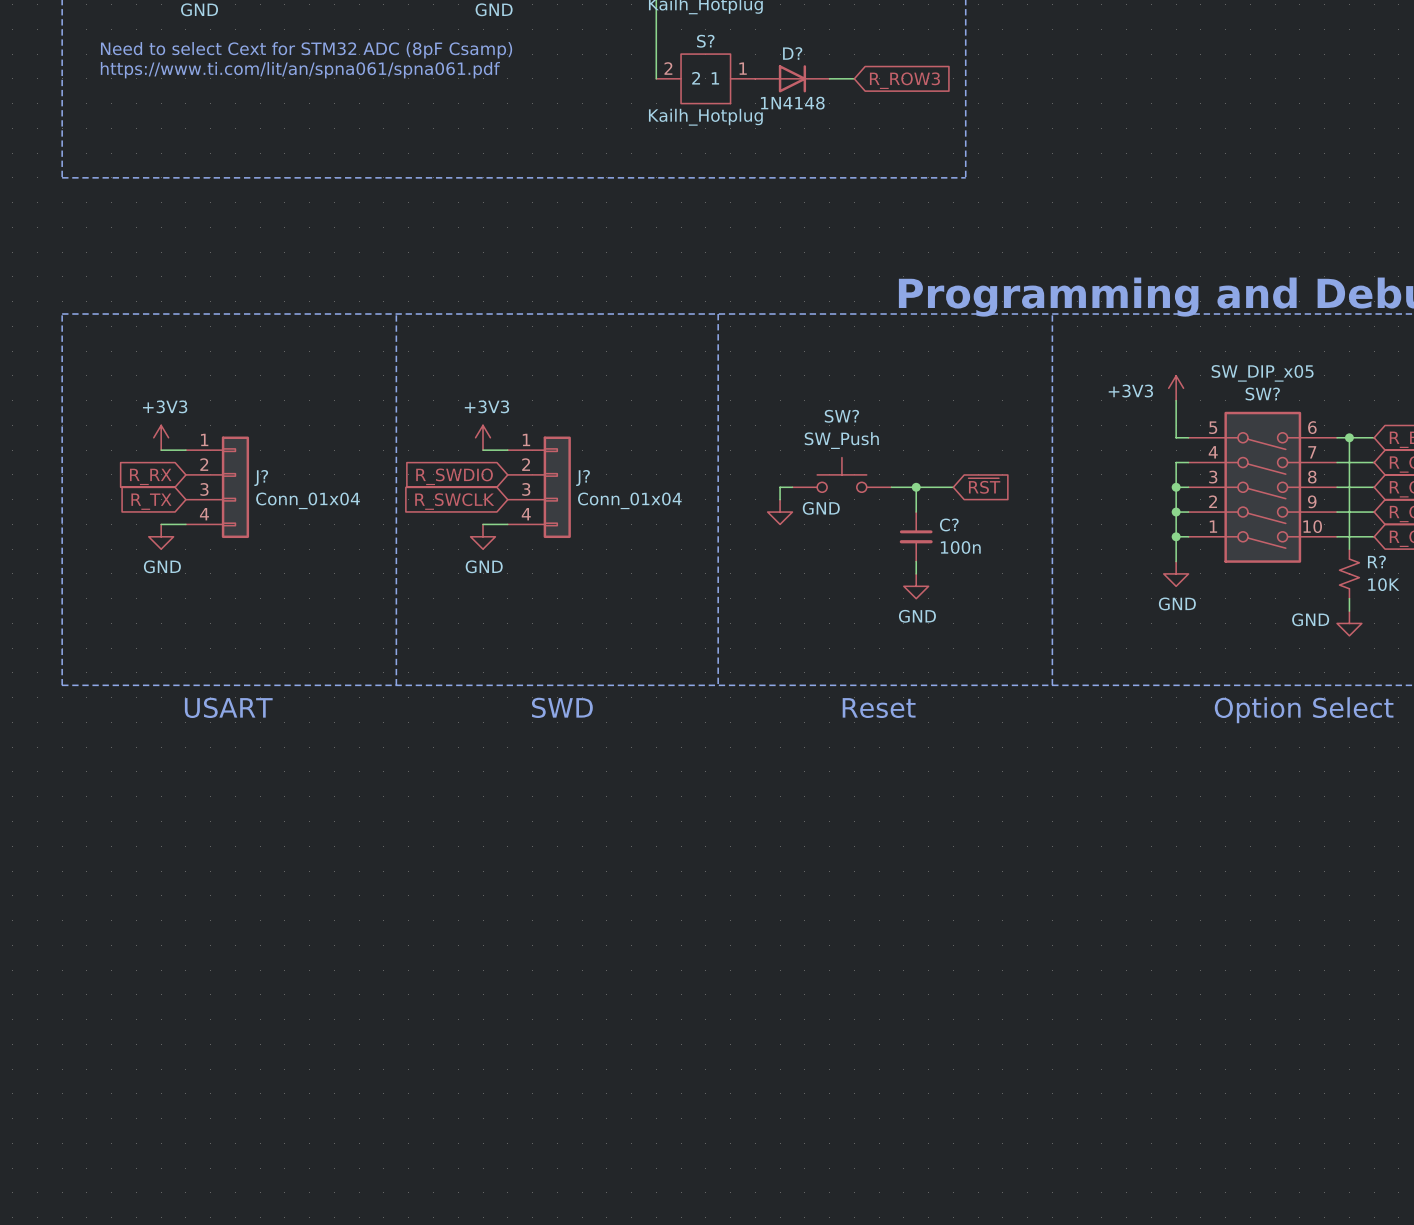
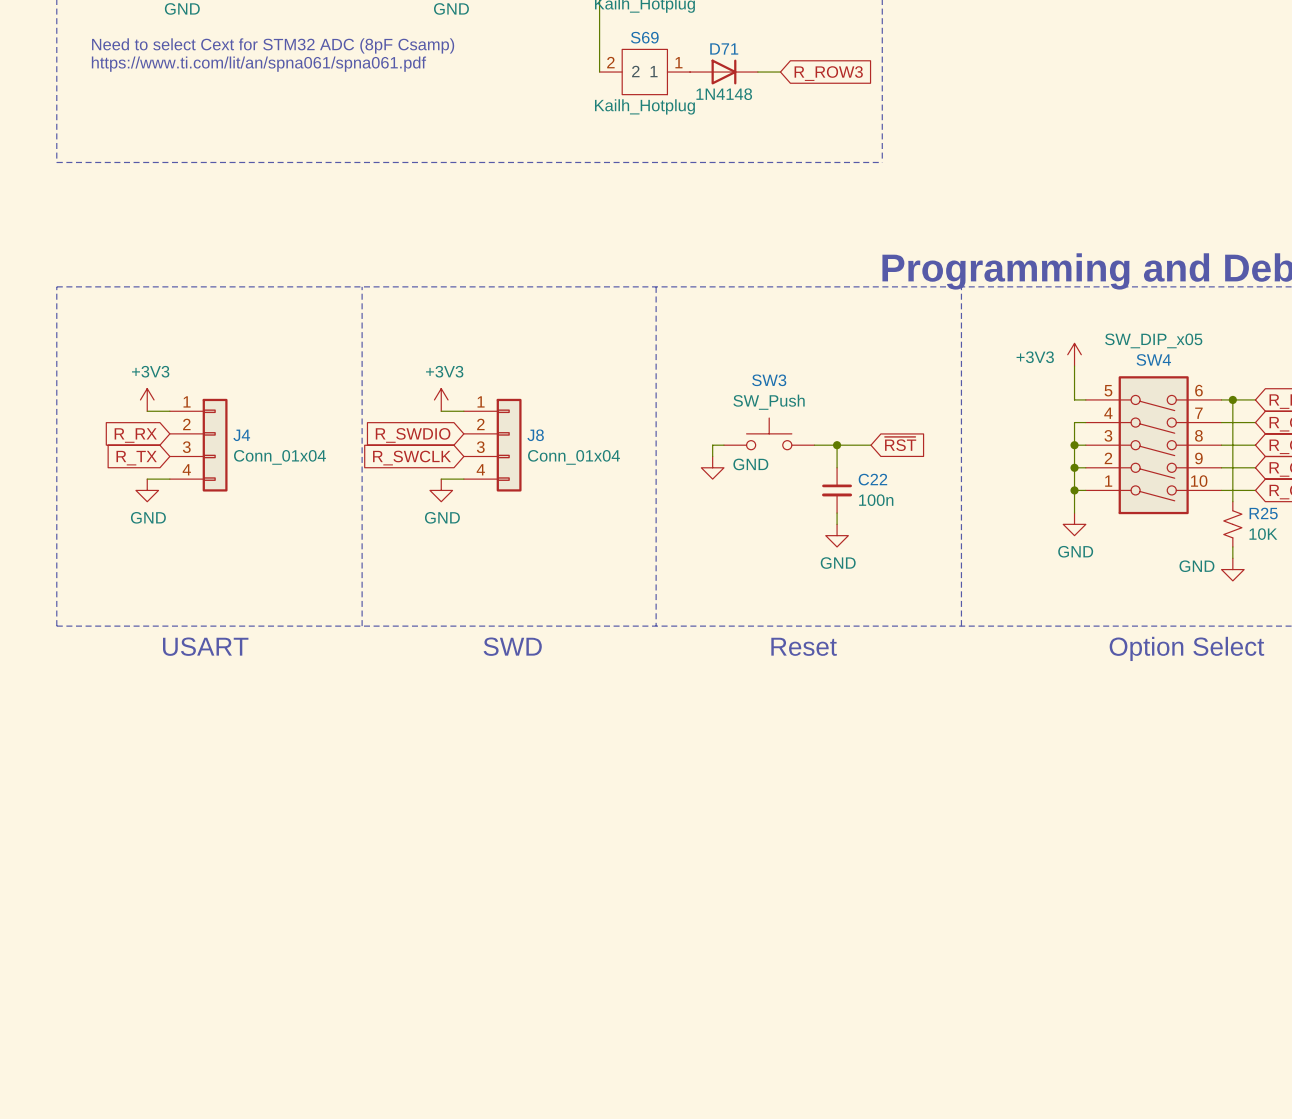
S? name: S? (705, 41) -> S69 (644, 37)
D? name: D? (792, 53) -> D71 (724, 48)
SW? name: SW? (1262, 394) -> SW4 (1153, 359)
SW? name: SW? (841, 416) -> SW3 (769, 380)
J? name: J? (261, 478) -> J4 (241, 435)
J? name: J? (583, 478) -> J8 (535, 435)
C? name: C? (949, 524) -> C22 (872, 479)
R? name: R? (1376, 561) -> R25 (1263, 513)

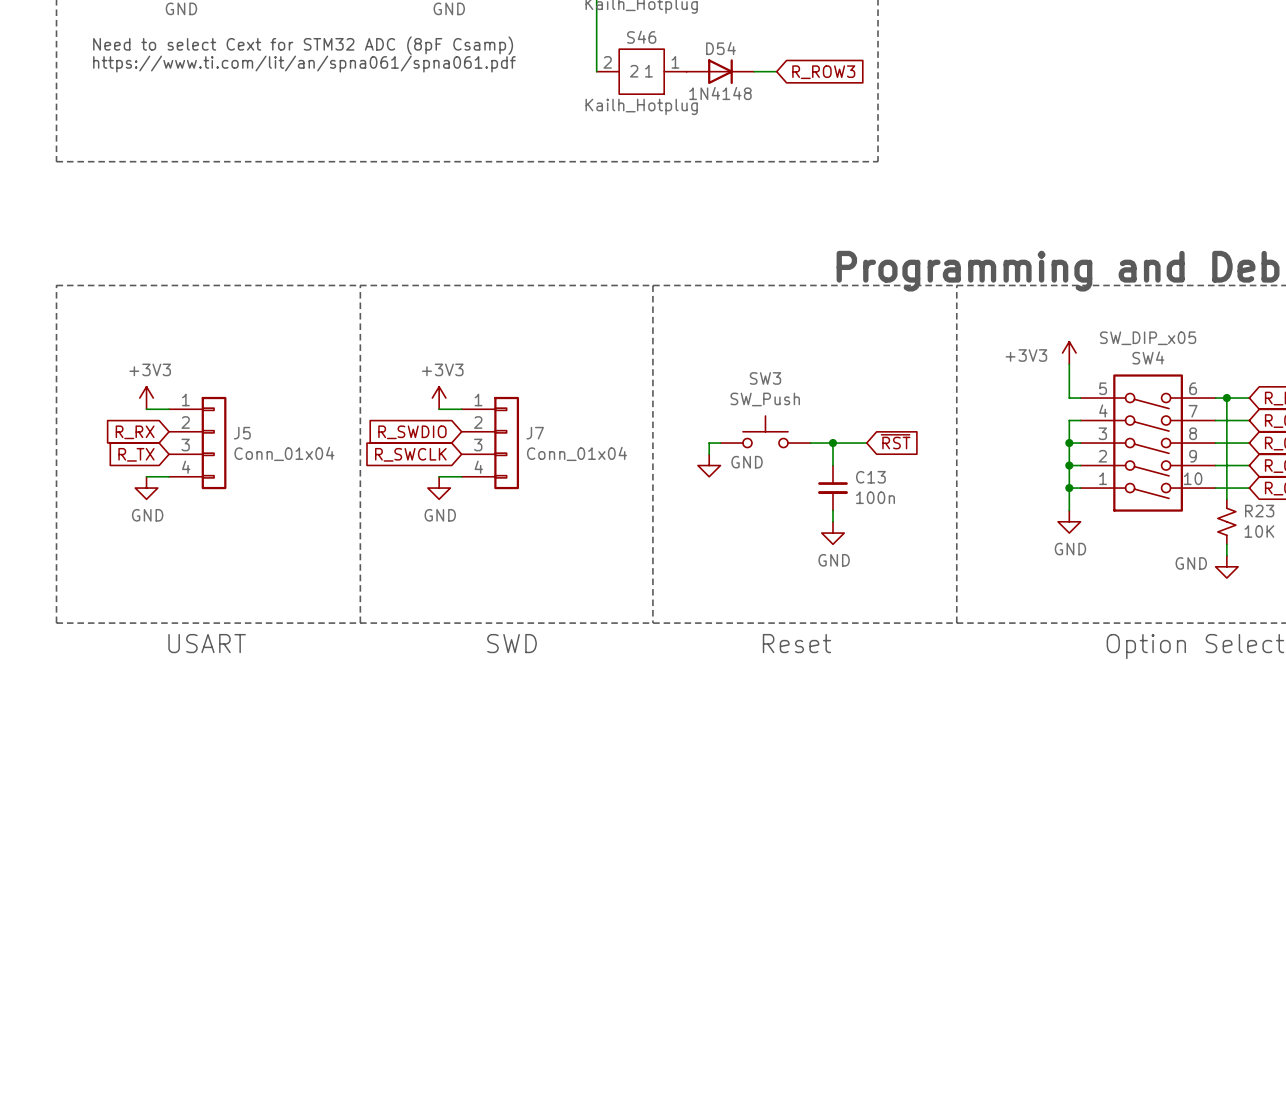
S69 name: S69 (644, 37) -> S46 (641, 37)
D71 name: D71 (724, 48) -> D54 (720, 48)
J4 name: J4 (241, 435) -> J5 (242, 433)
J8 name: J8 (535, 435) -> J7 (535, 433)
C22 name: C22 (872, 479) -> C13 (870, 477)
R25 name: R25 (1263, 513) -> R23 (1259, 511)

